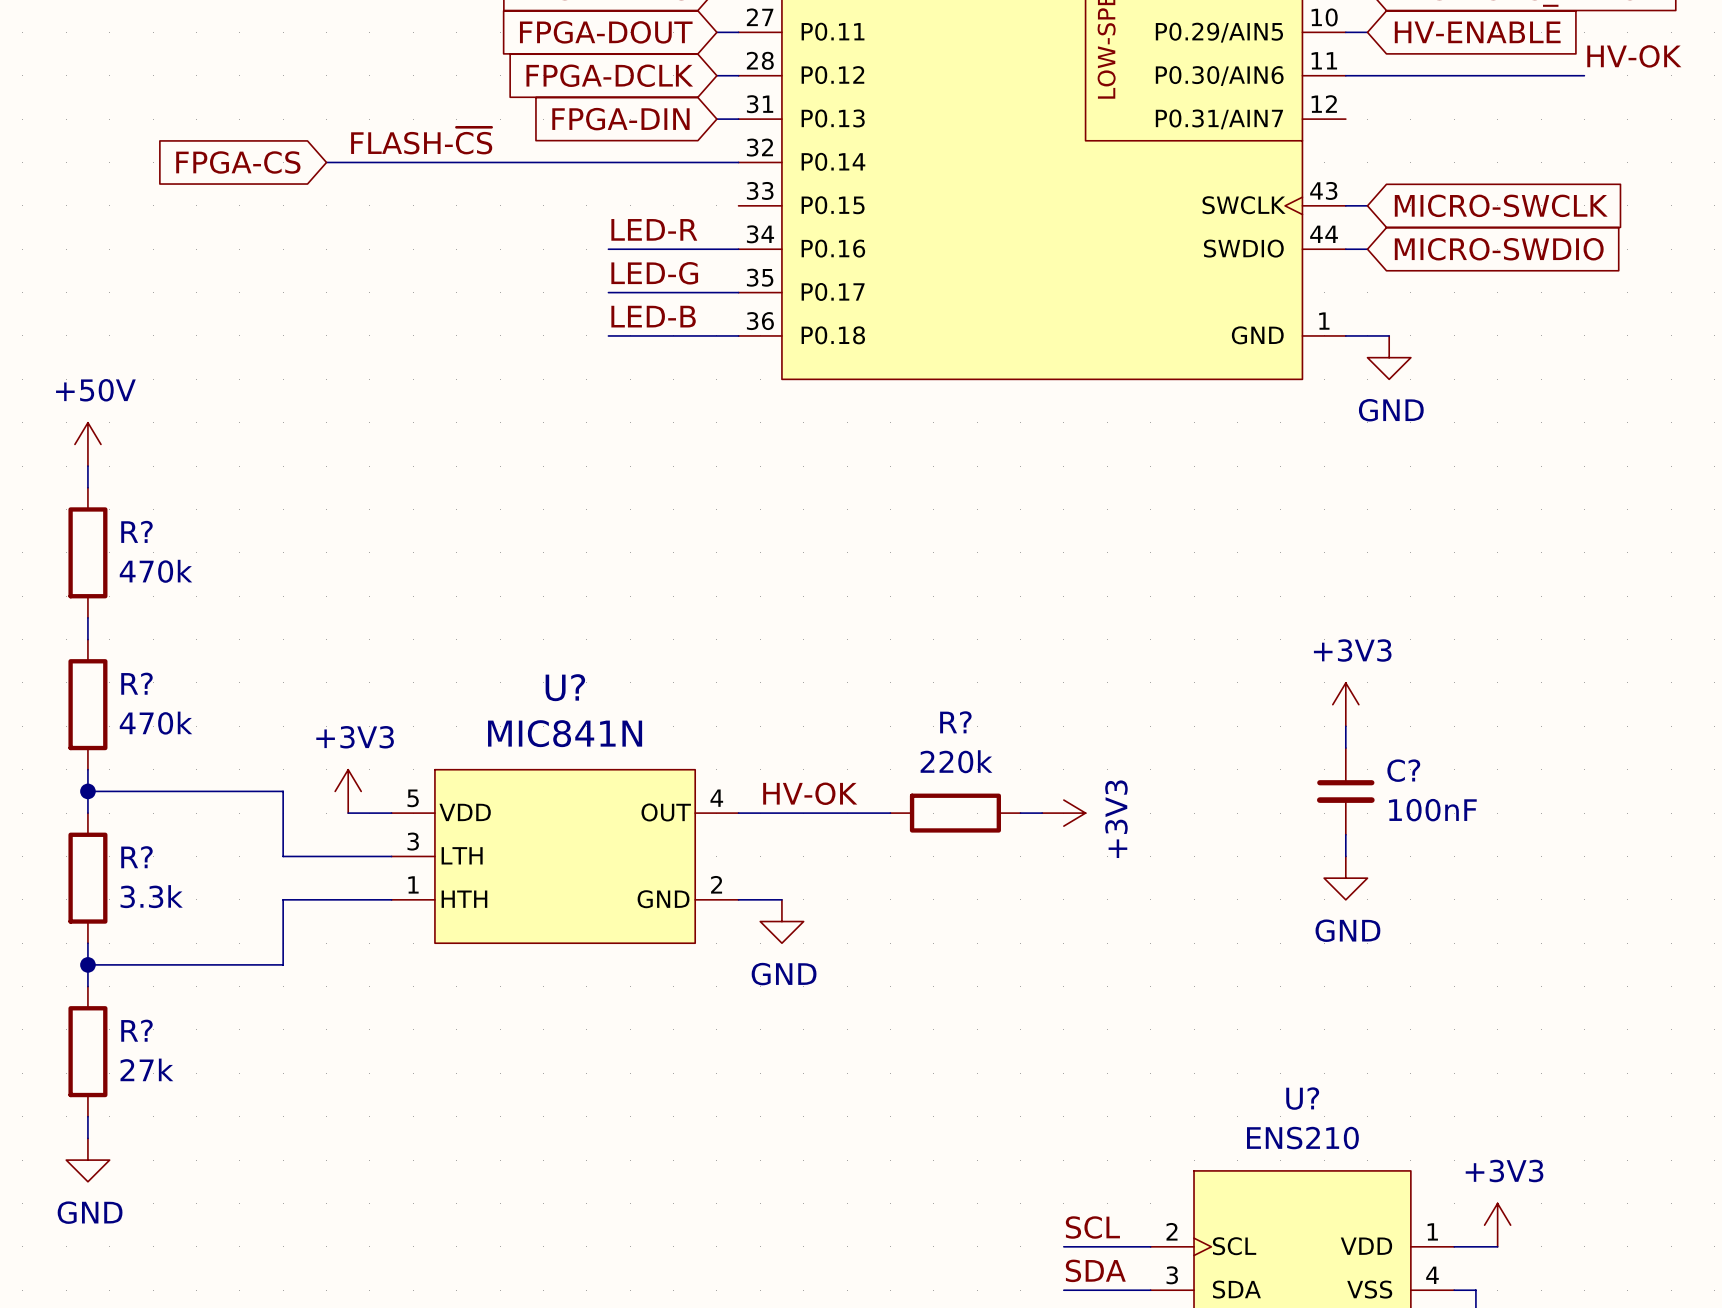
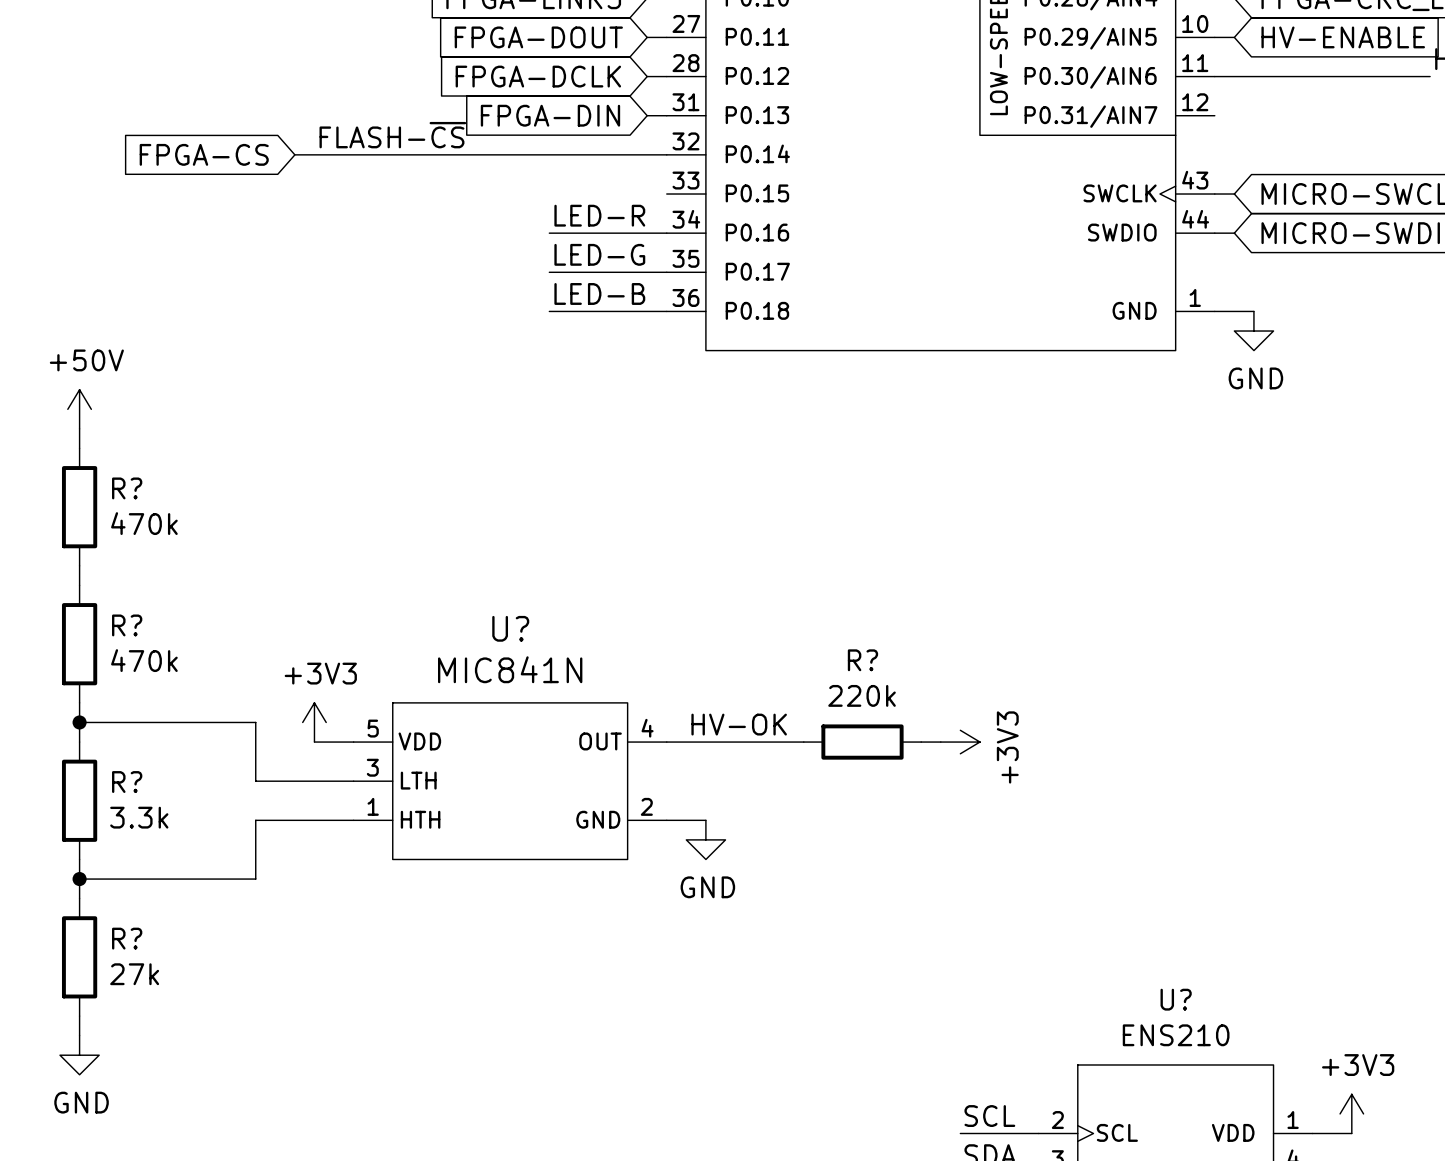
power symbol: +3V3 (1345, 704) -> none
wire: (1345, 726) (1345, 748) -> none
C?: 100nF (1345, 791) -> none
wire: (1345, 834) (1345, 856) -> none
power symbol: GND (1345, 878) -> none

